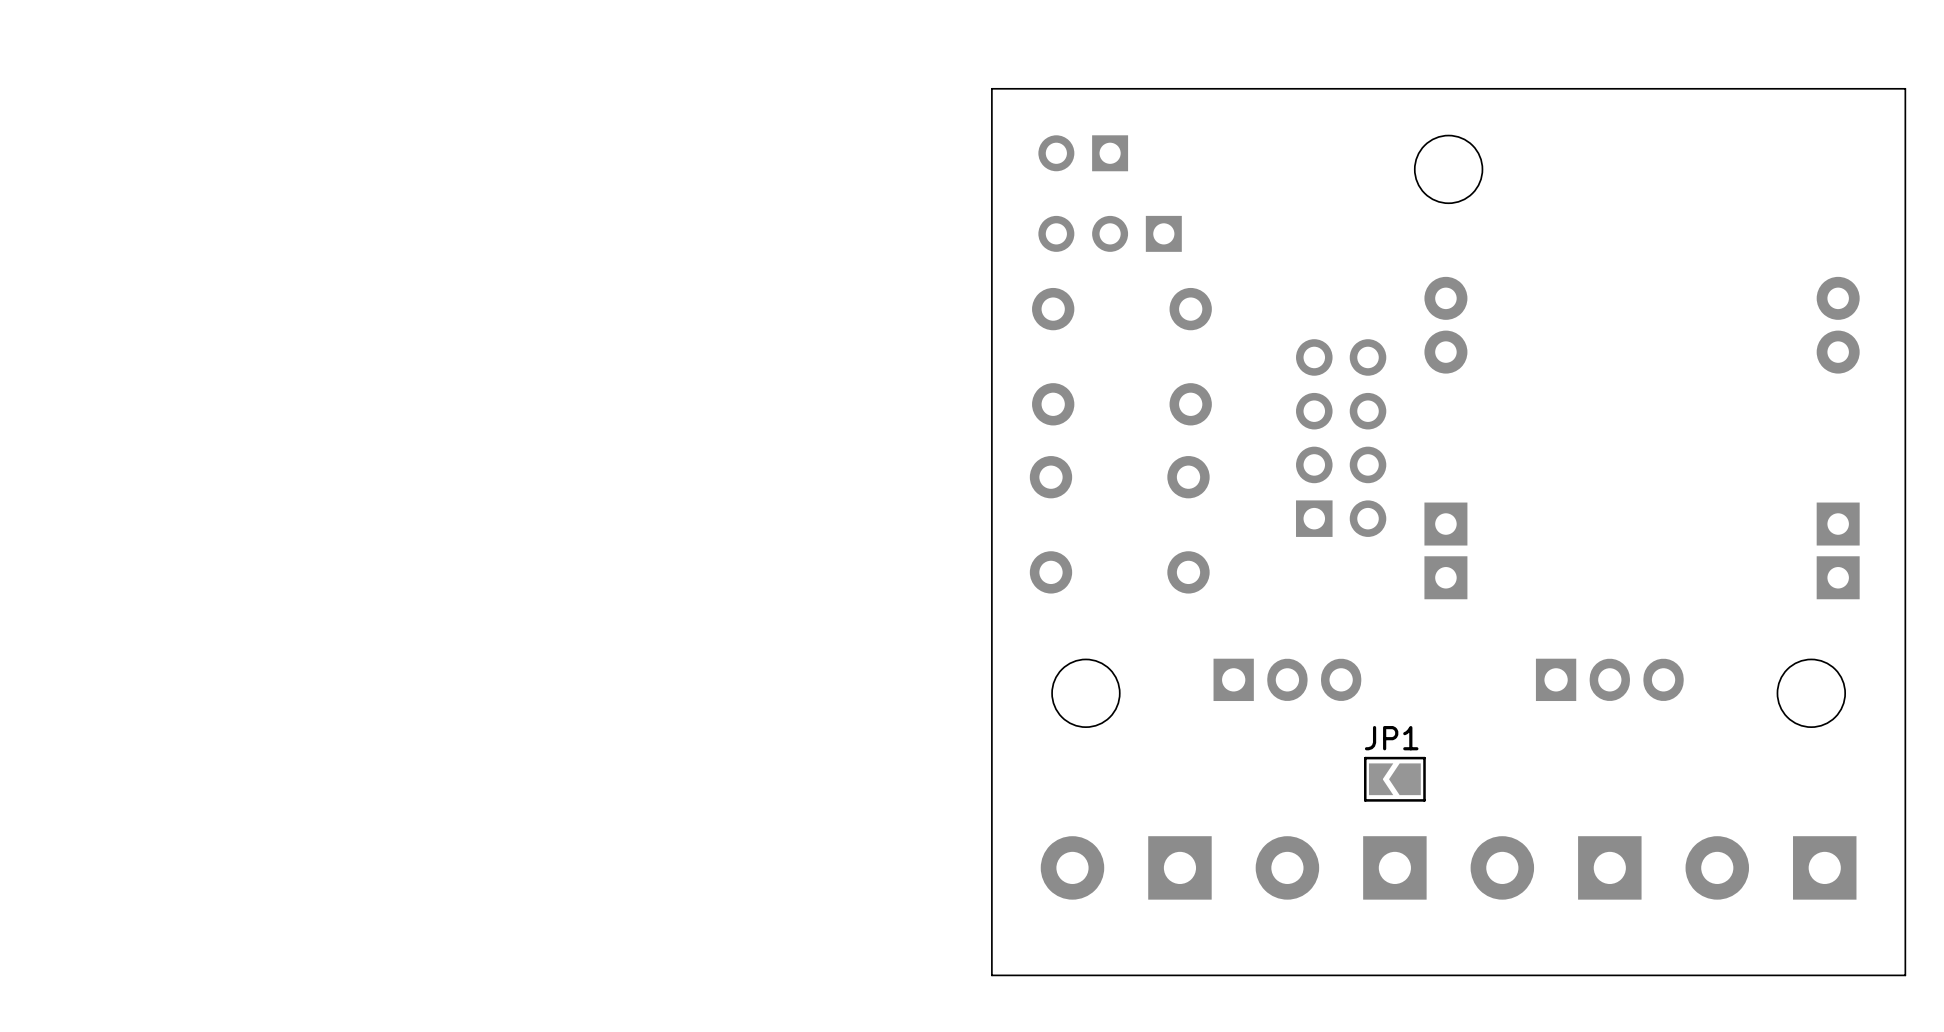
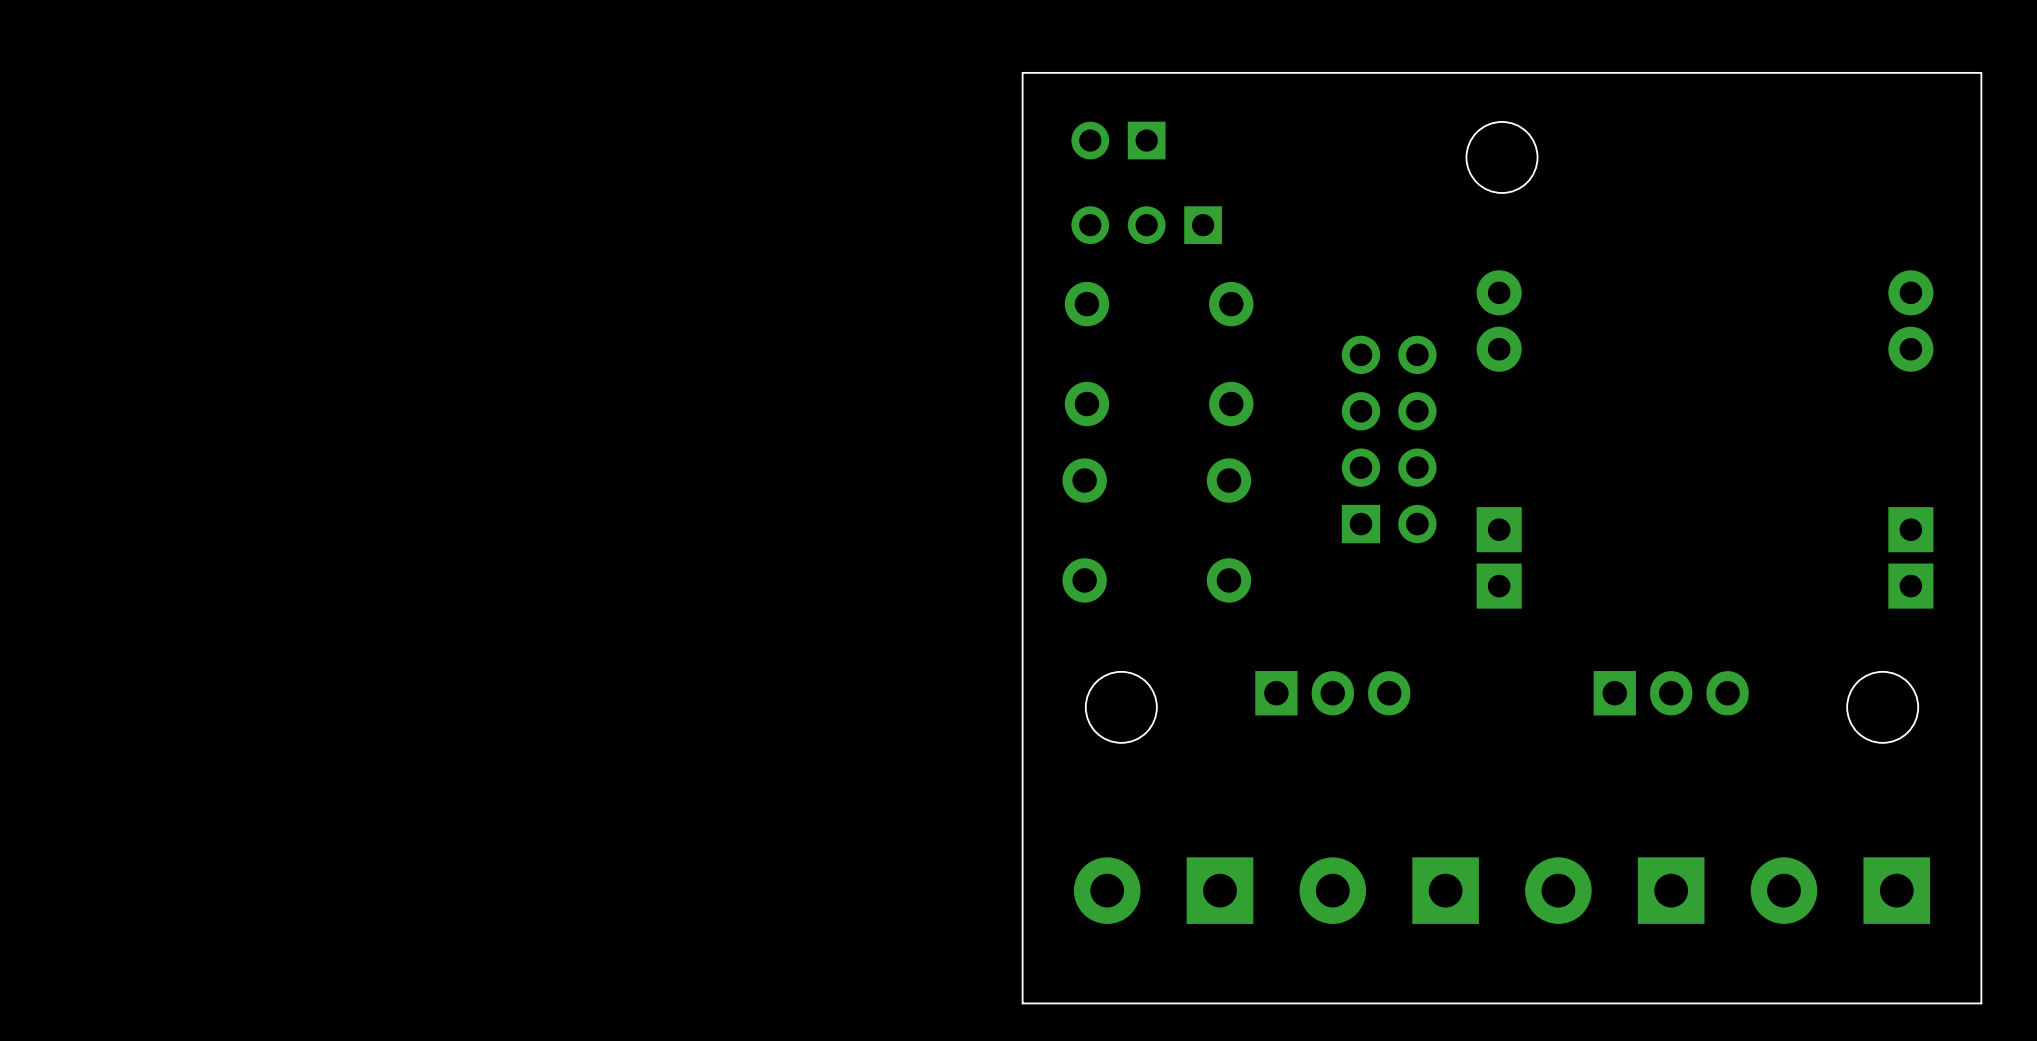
JP1: (1394, 779) -> none

